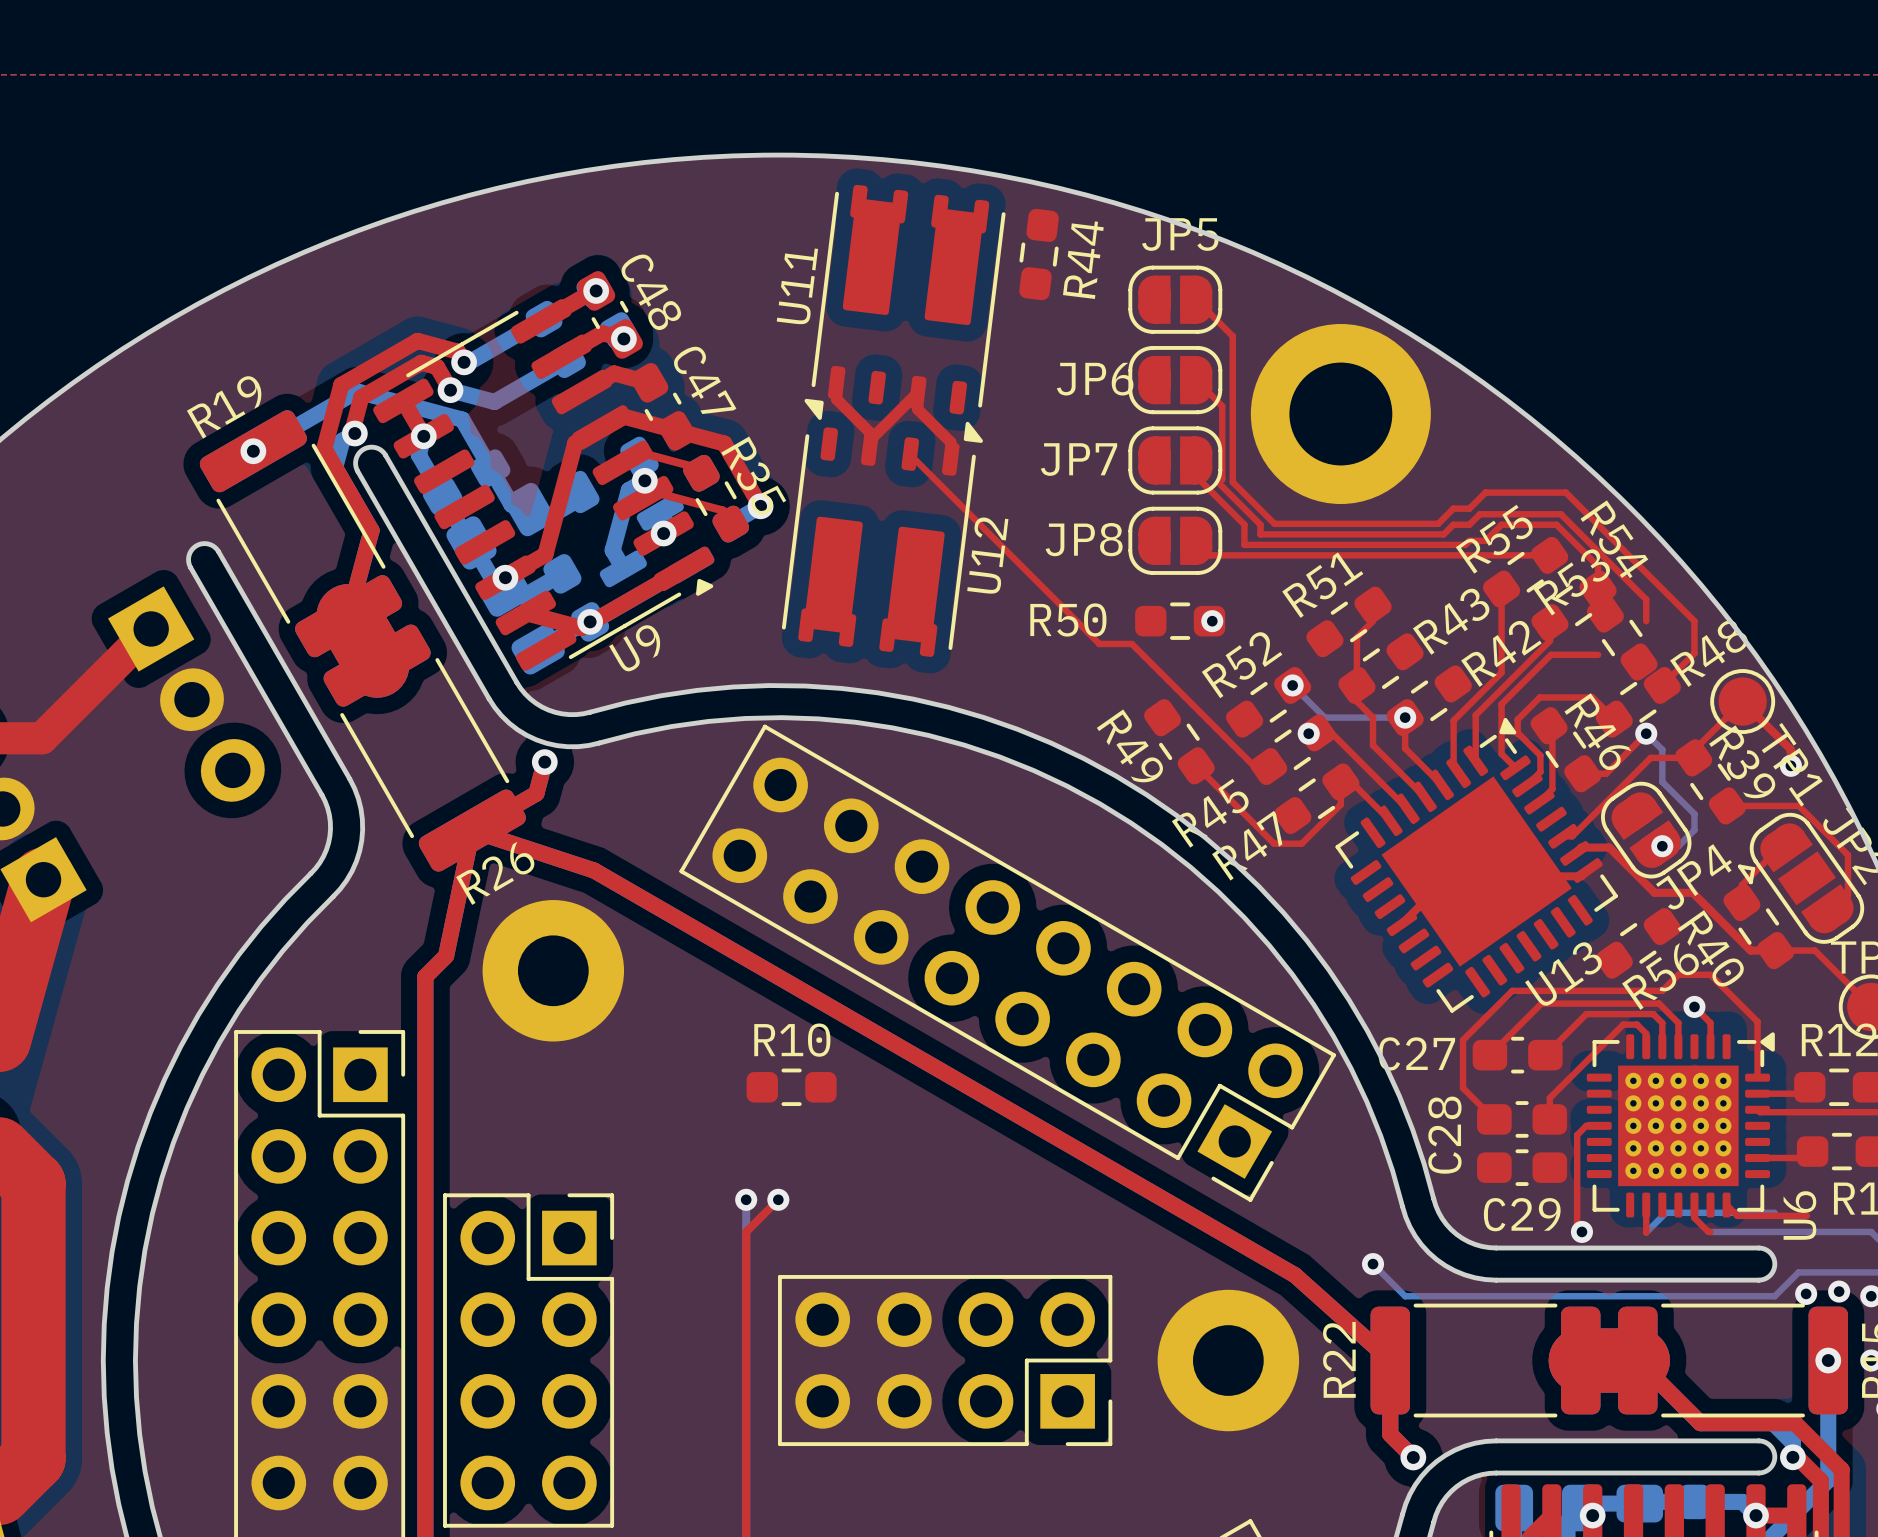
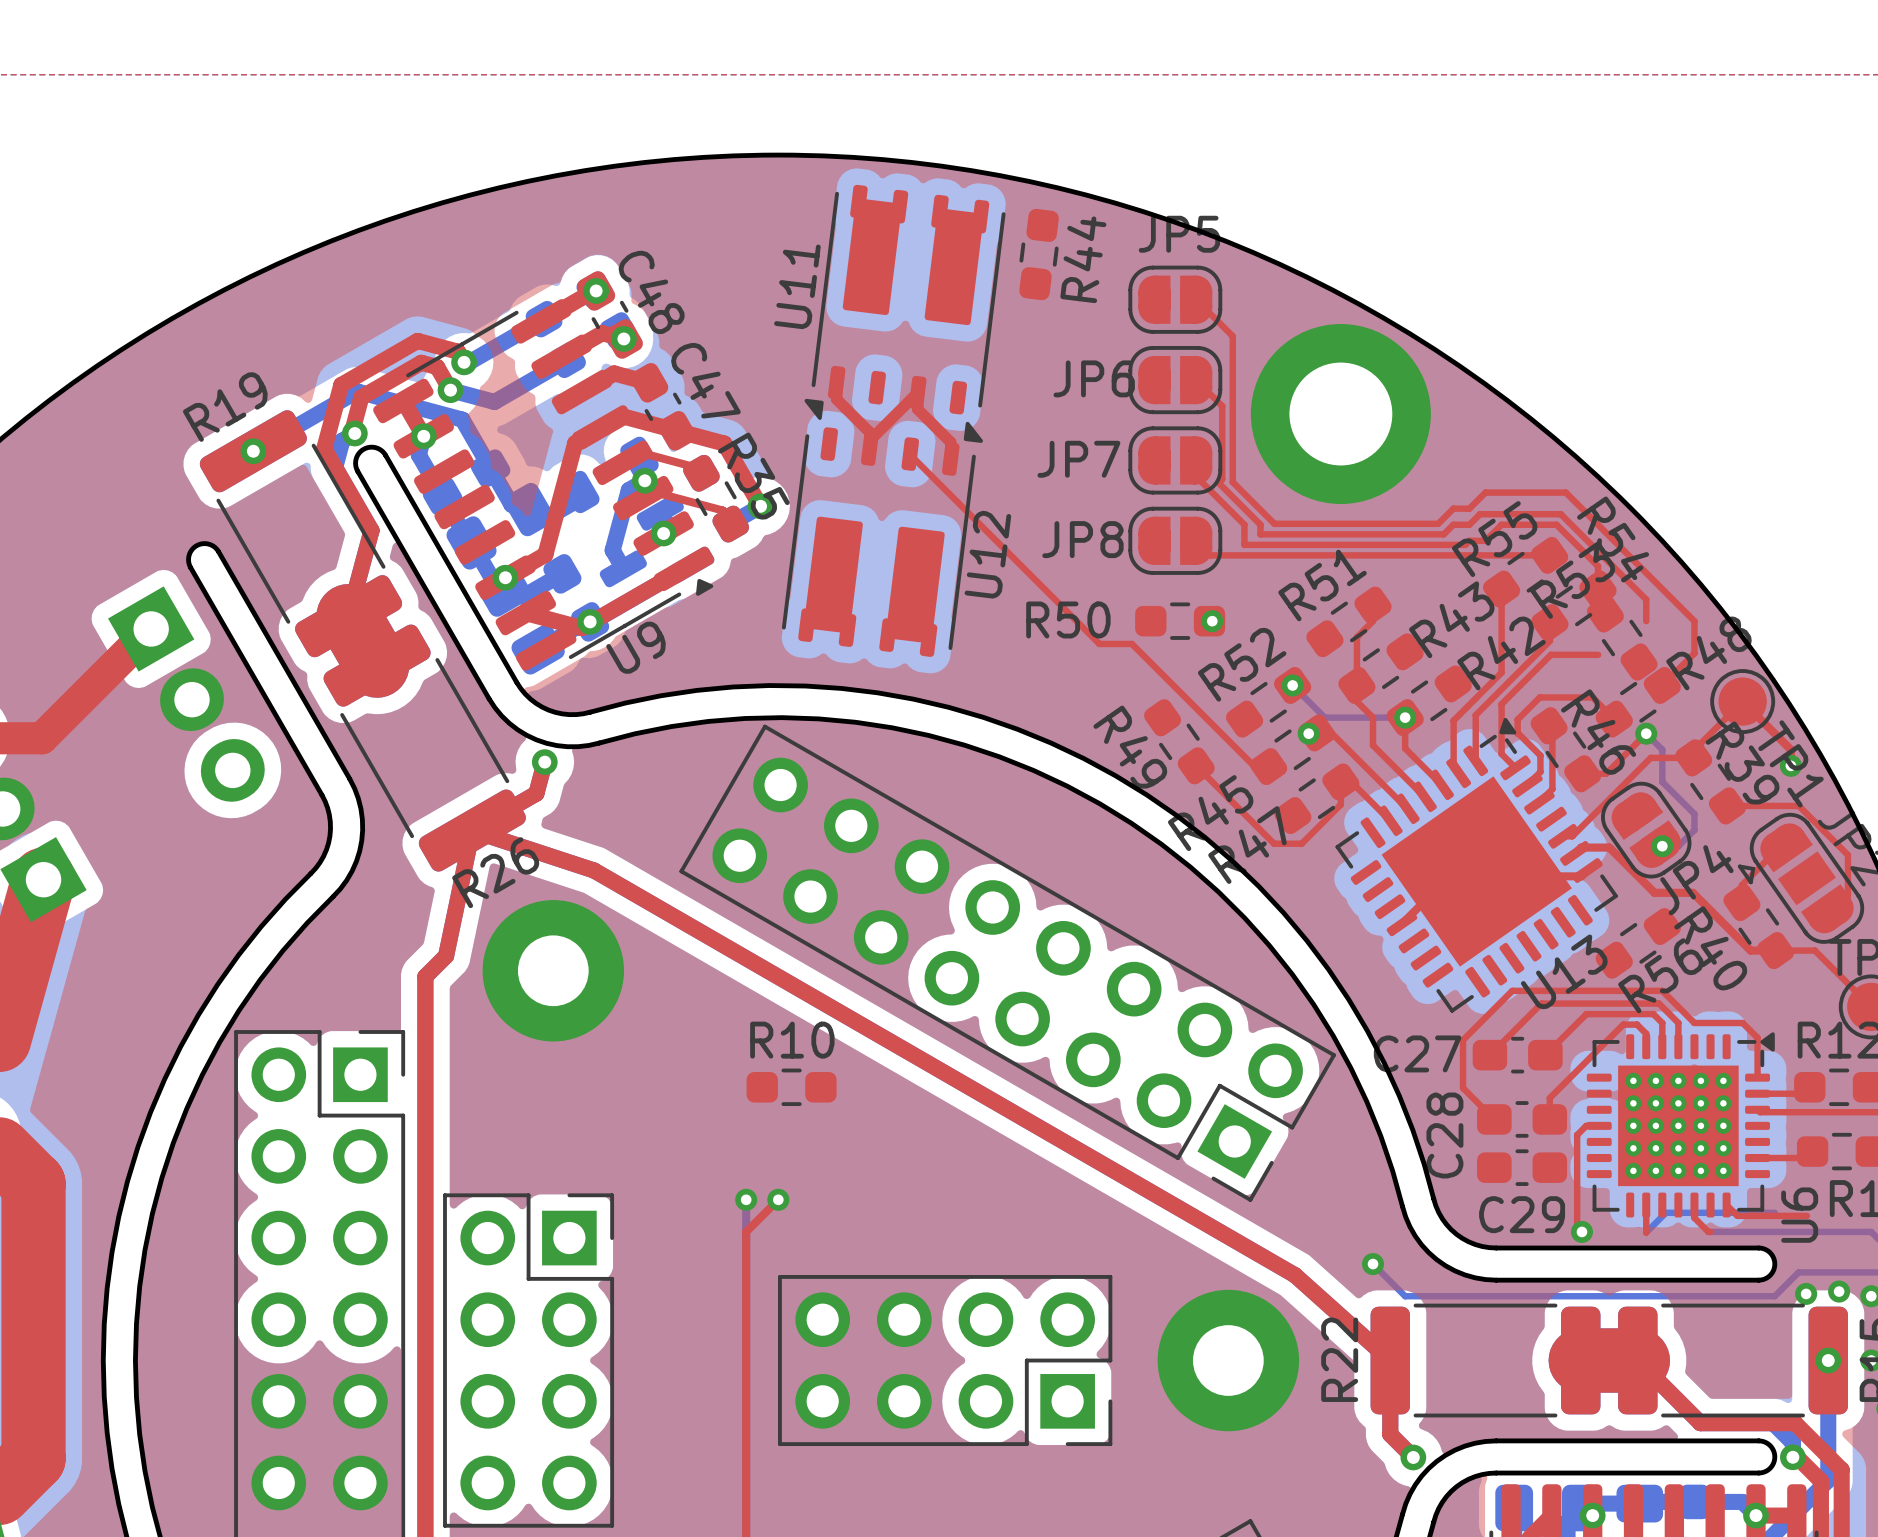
top track: (1662, 990) (1678, 974) (1710, 974) (1757, 1021) (1757, 1037) -> (1662, 990) (1694, 1022) (1742, 1022) (1757, 1037)
top track: (1694, 1006) (1710, 1022) (1710, 1046) -> none
via: (1694, 1006) -> none

